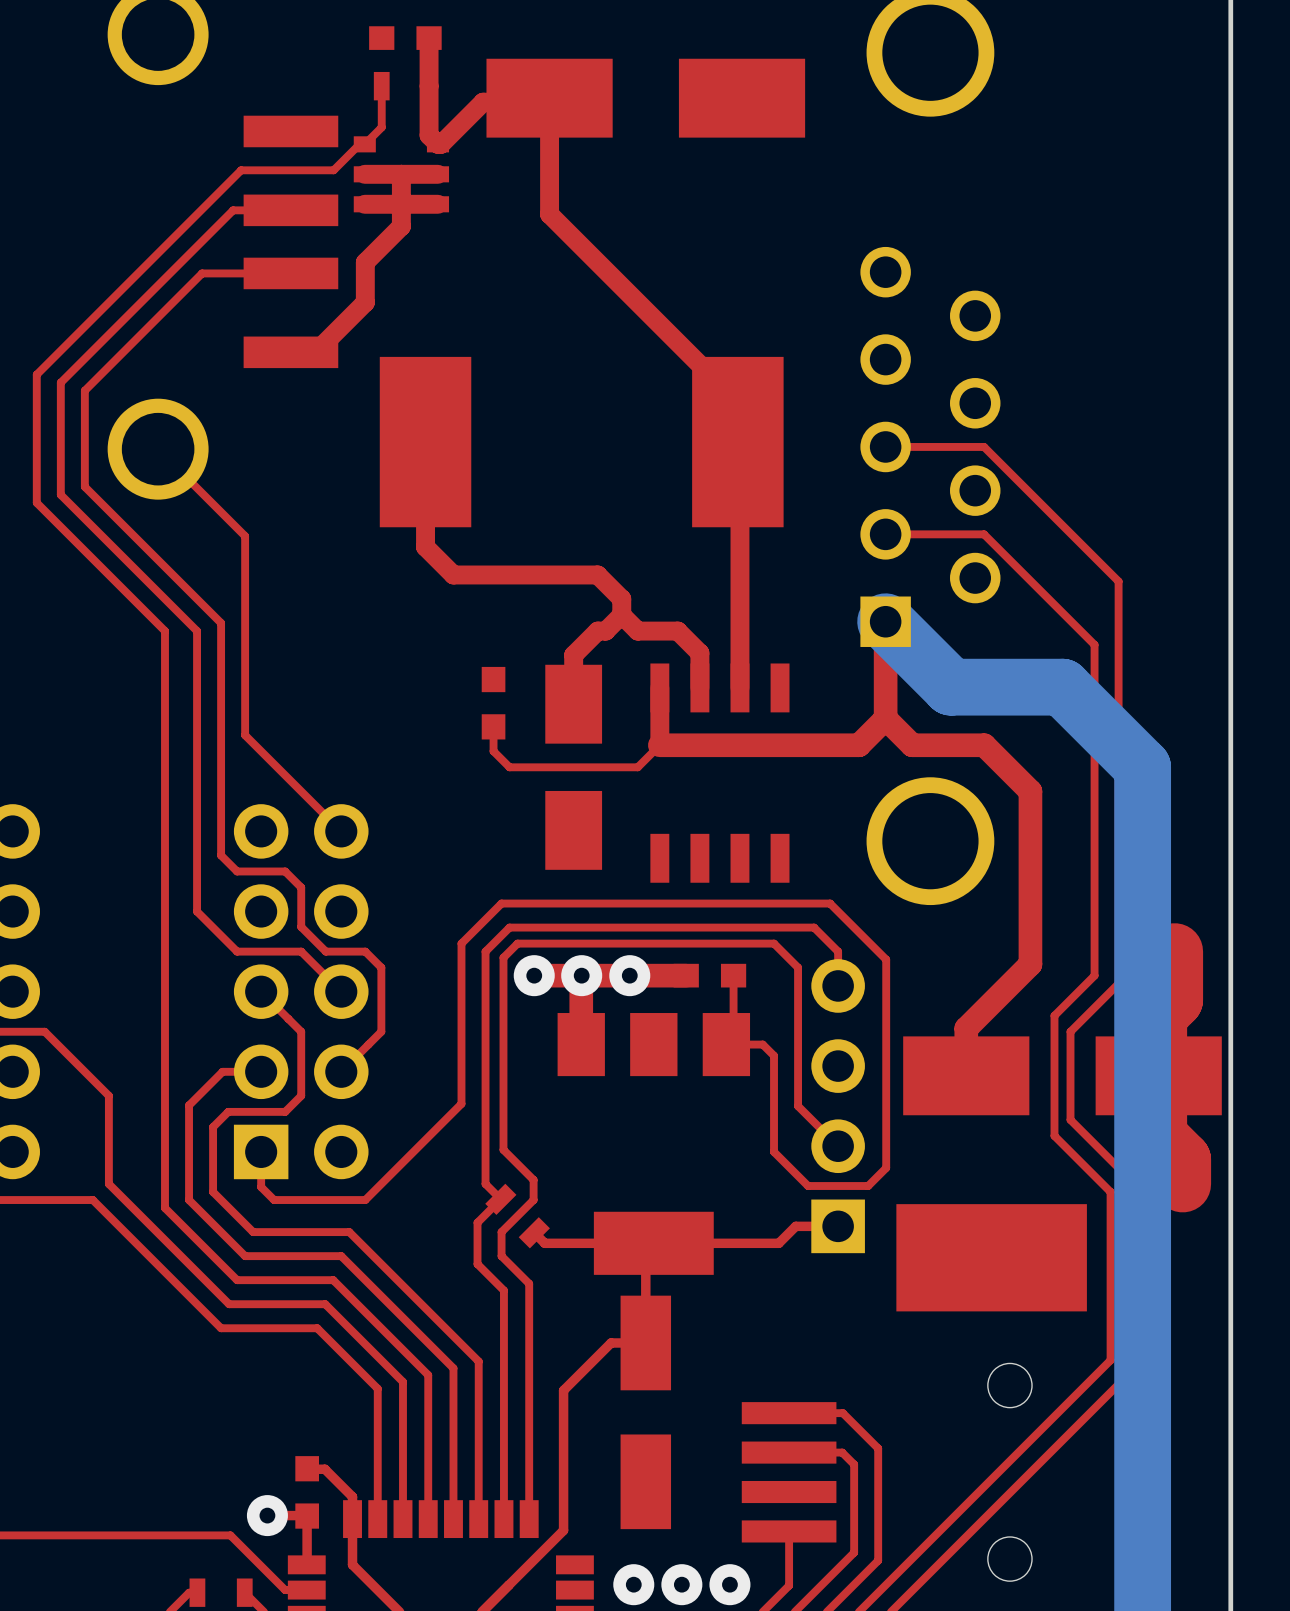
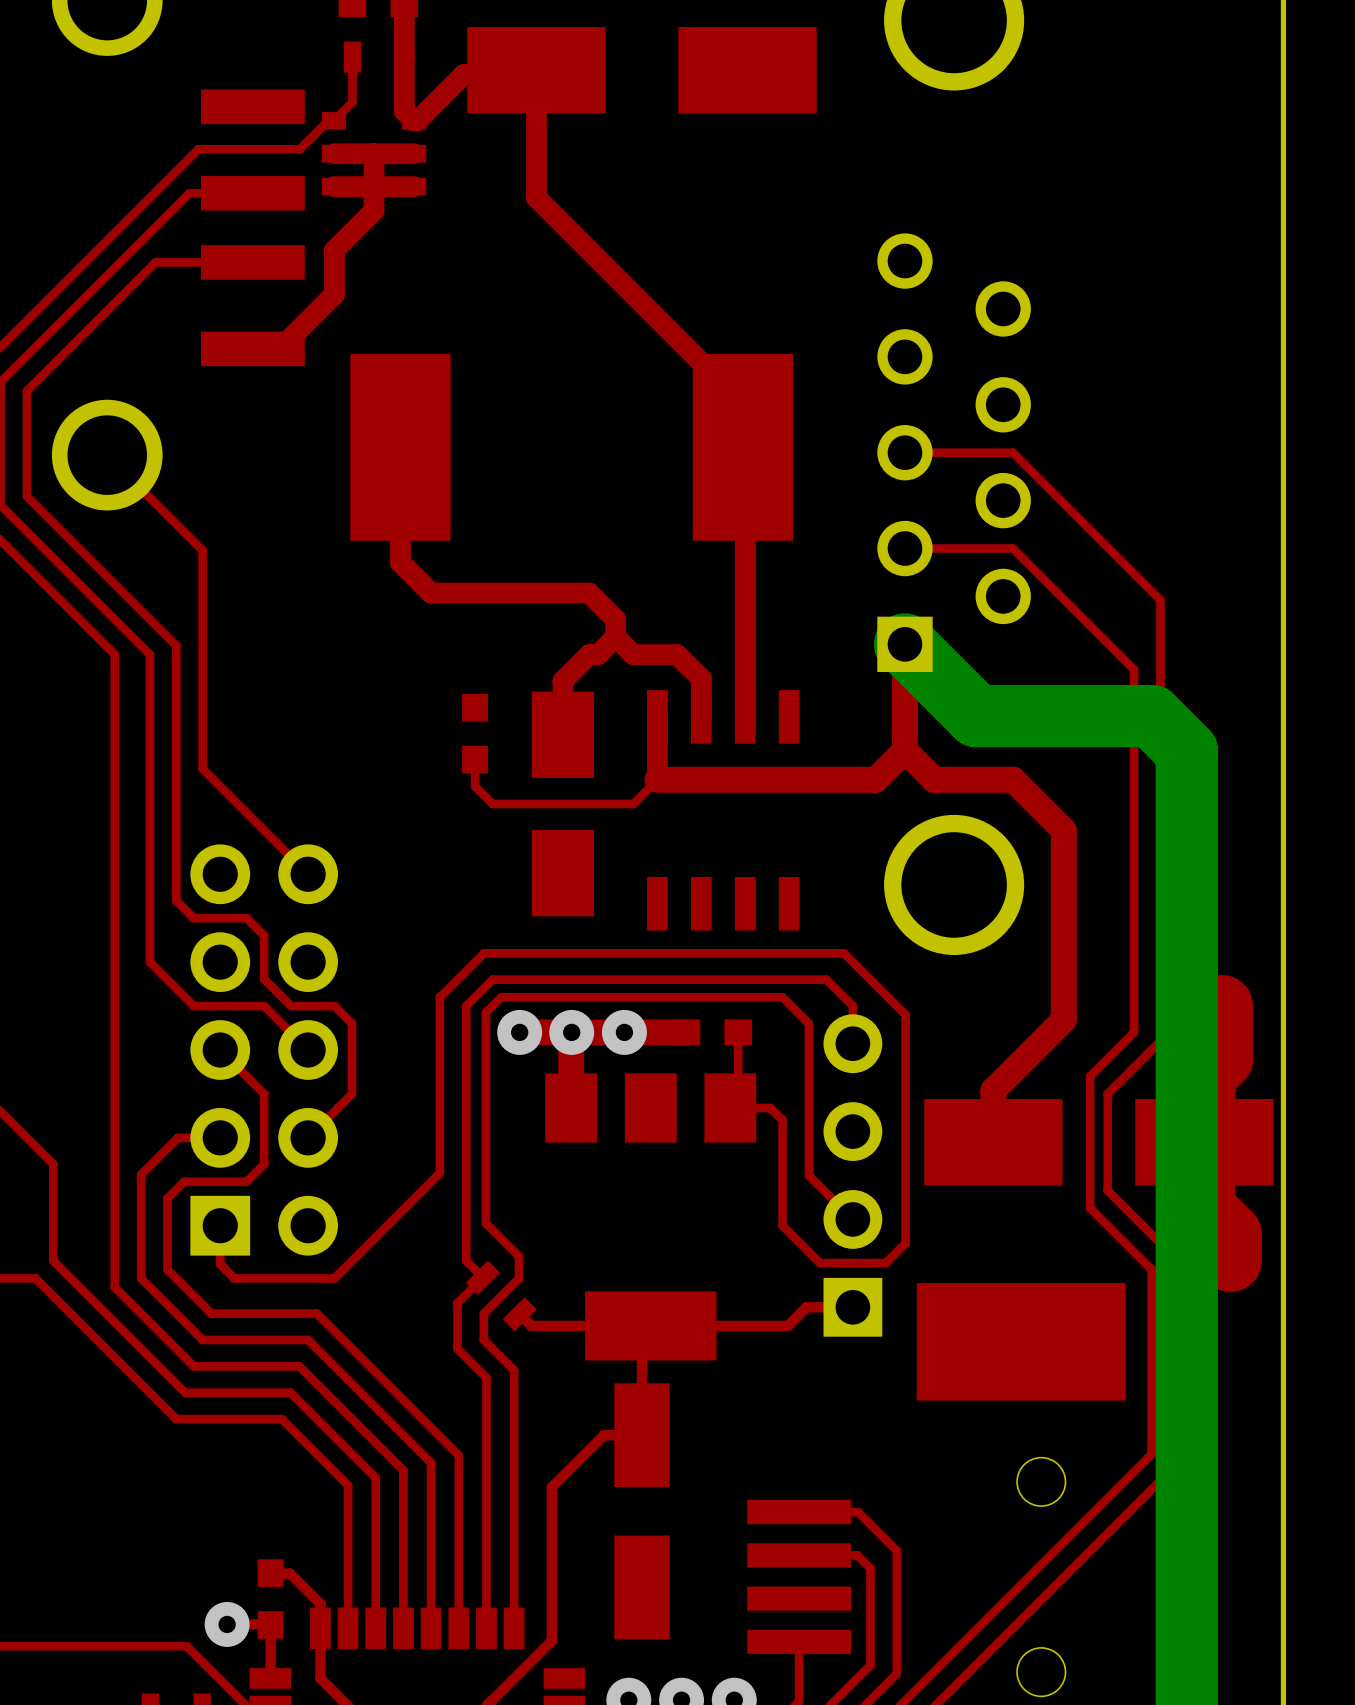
bottom track: (1062, 687) (1142, 767) -> (1098, 716) (1151, 716) (1186, 751) (1186, 803)

